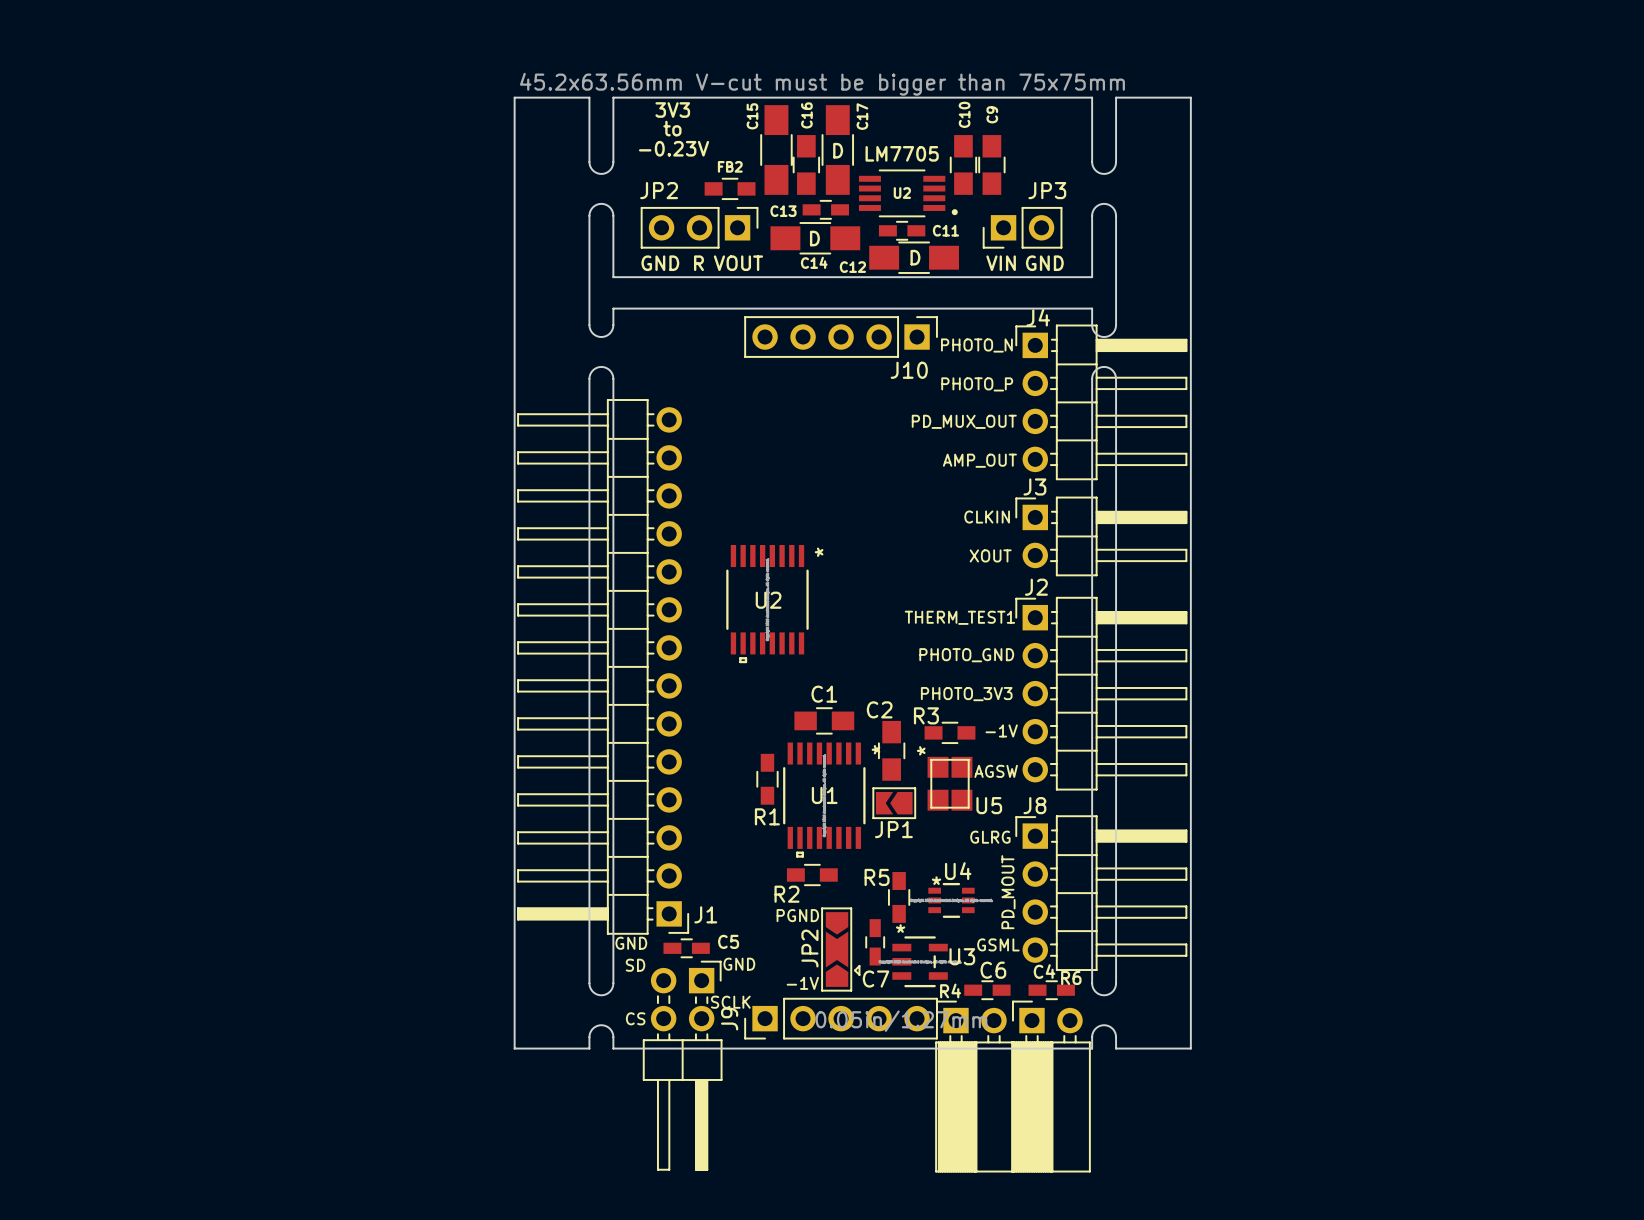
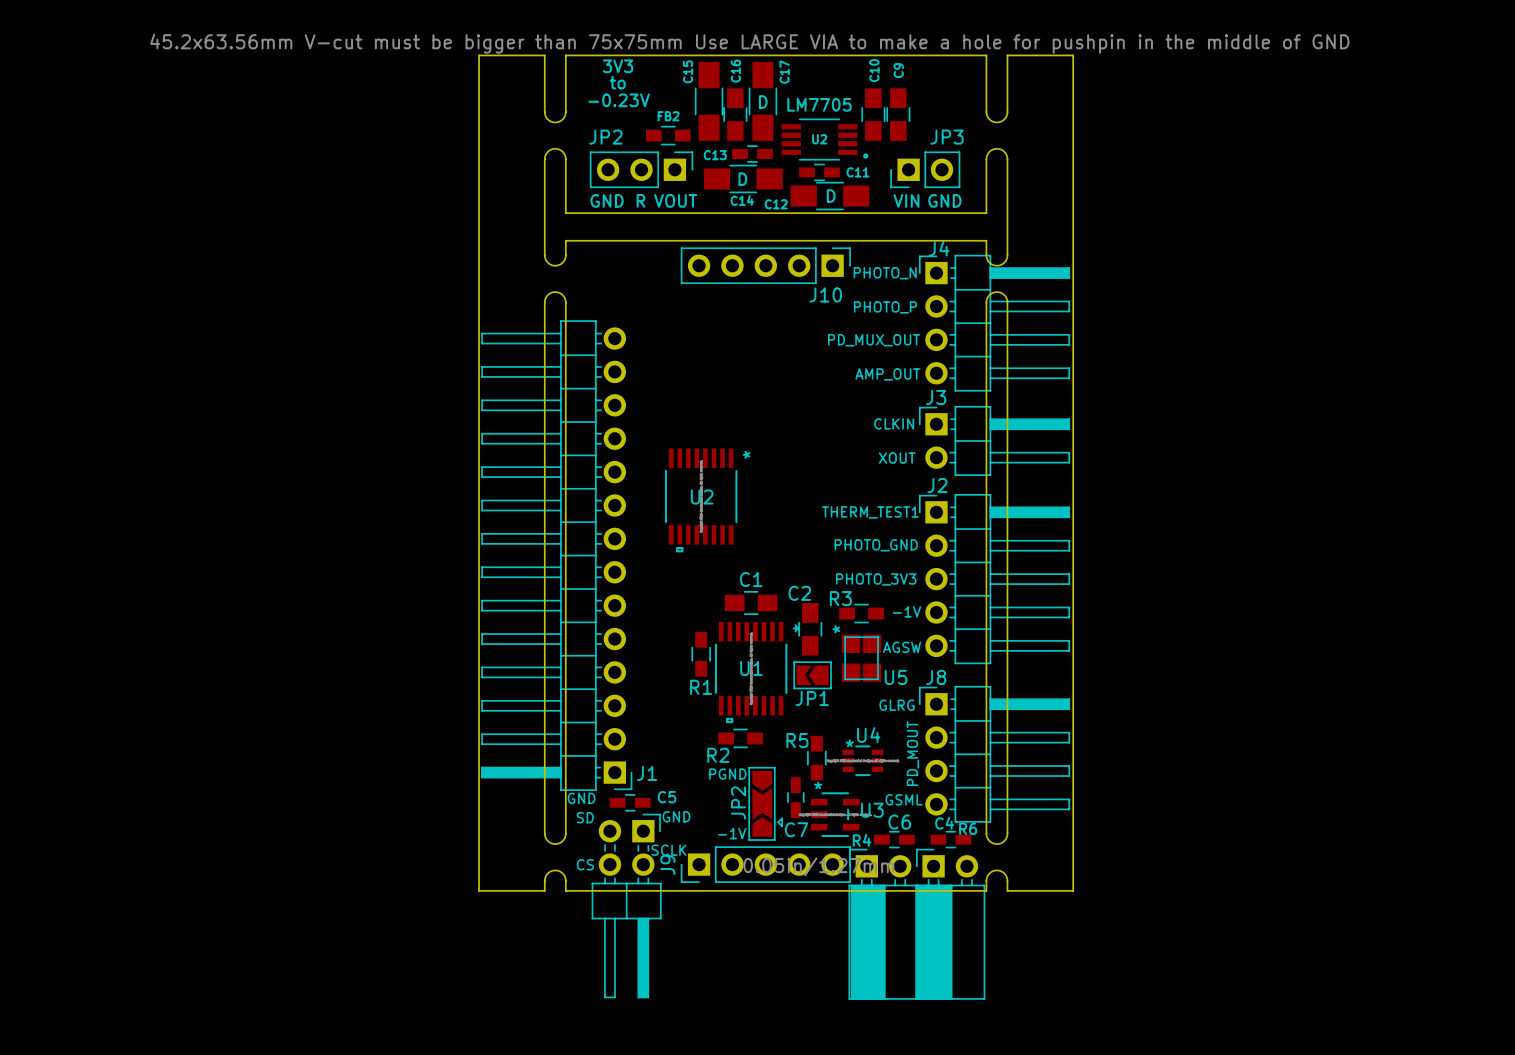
text: 45.2x63.56mm V-cut must be bigger than 75x75mm (822, 84) -> 45.2x63.56mm V-cut must be bigger than 75x75mm Use LARGE VIA to make a hole for pushpin in the middle of GND (749, 43)

